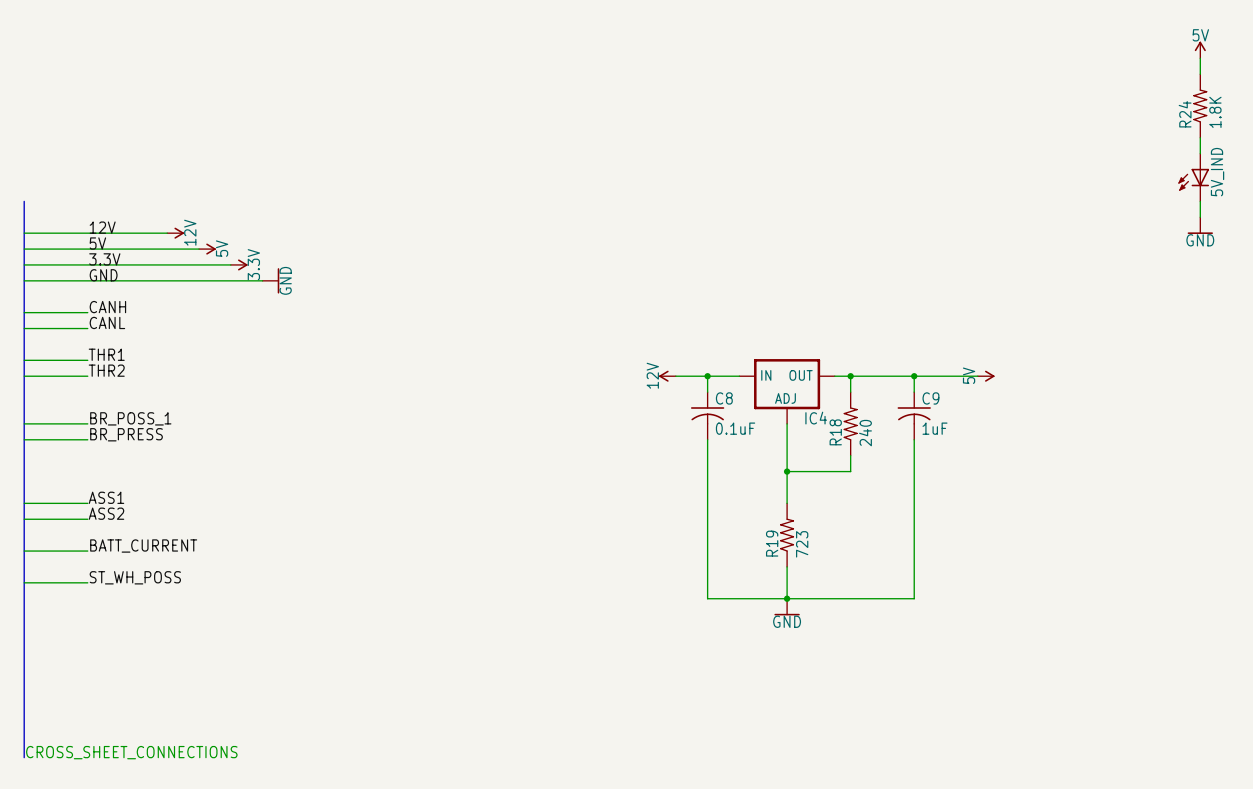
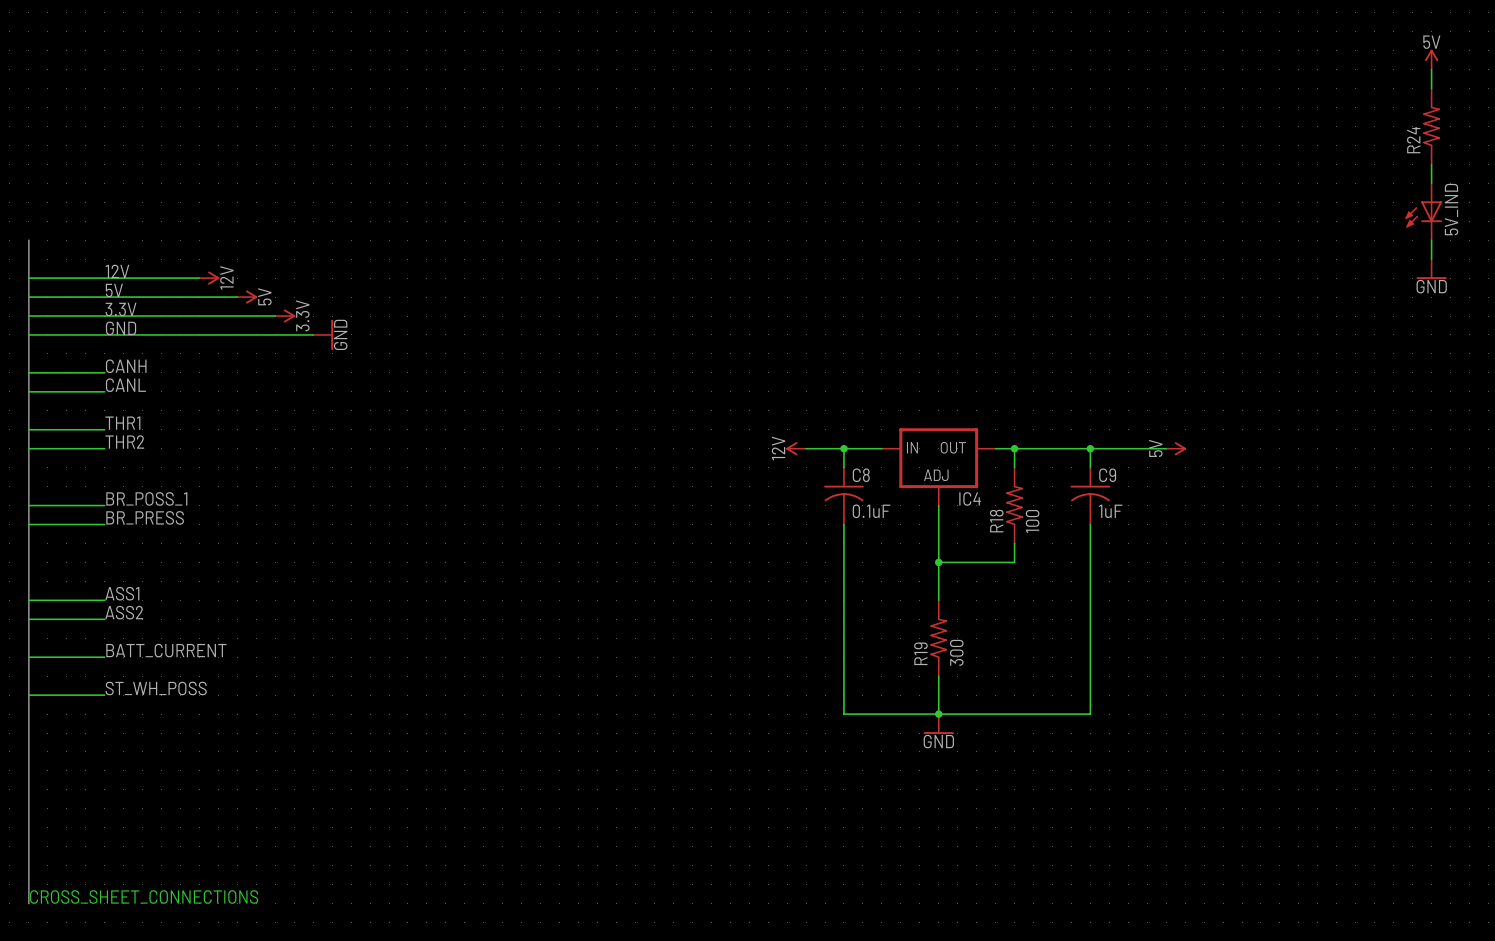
R24 value: 1.8K (1215, 112) -> none
R18 value: 240 (865, 433) -> 100 (1032, 521)
R19 value: 723 (802, 544) -> 300 (956, 652)

